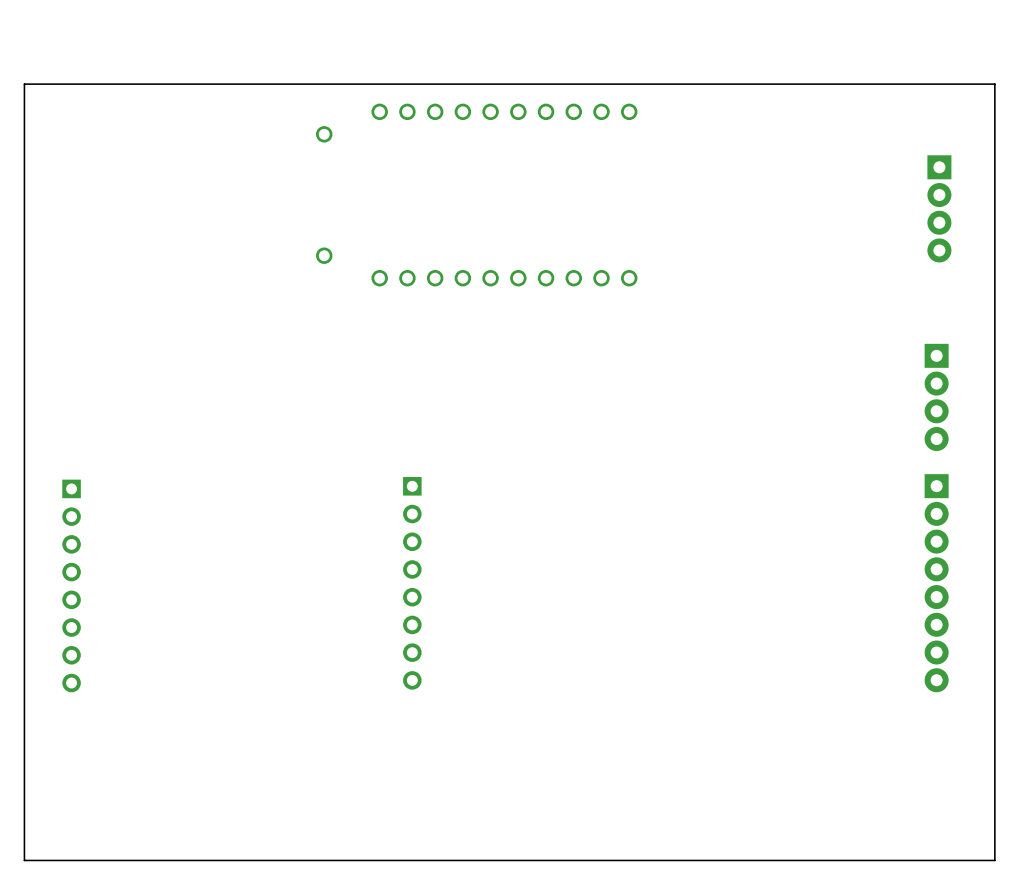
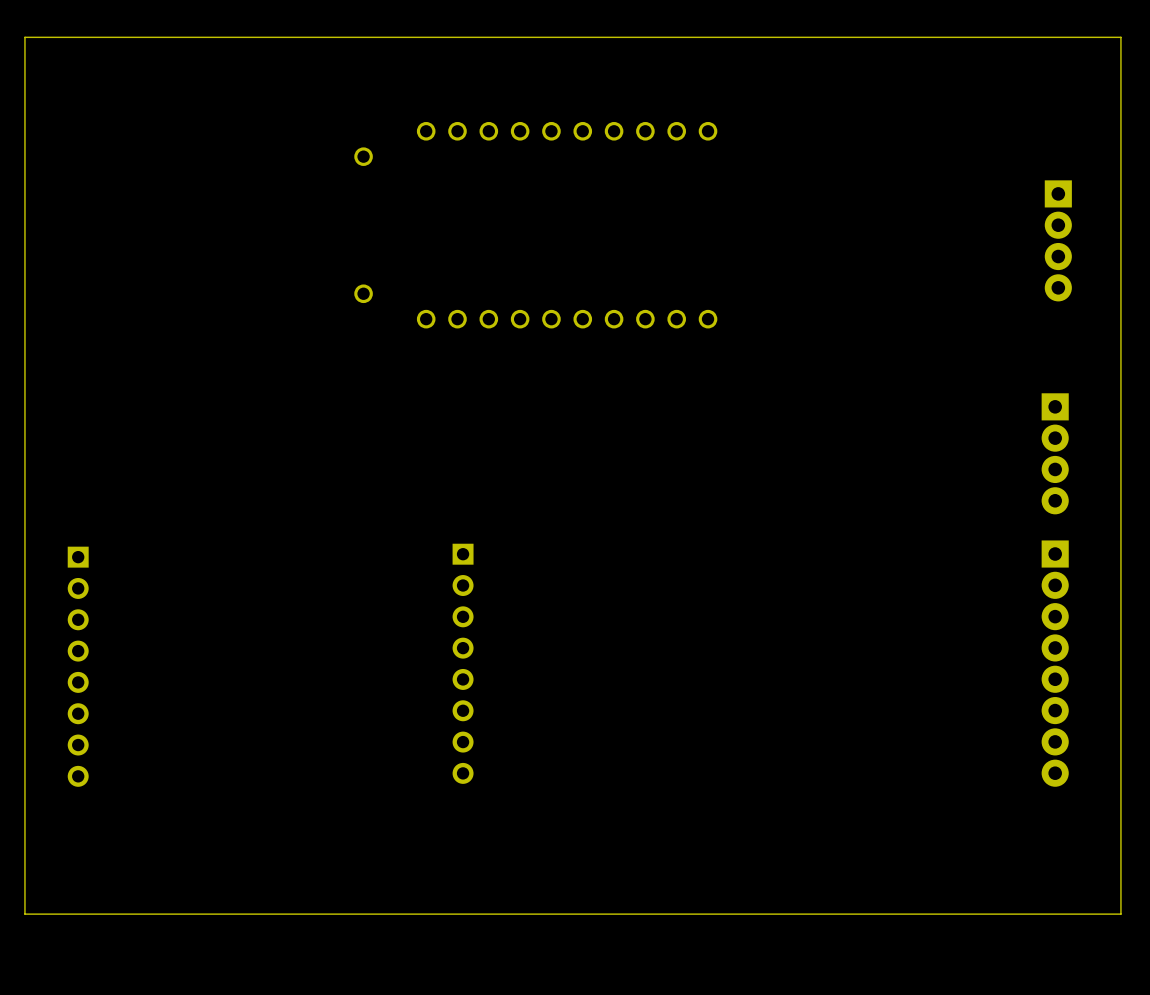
board edge: (994, 84) (24, 84) -> (1120, 99) (1120, 37) (24, 37) (24, 99)
board edge: (994, 805) (994, 860) (24, 860) (24, 805) -> (1120, 914) (24, 914)

